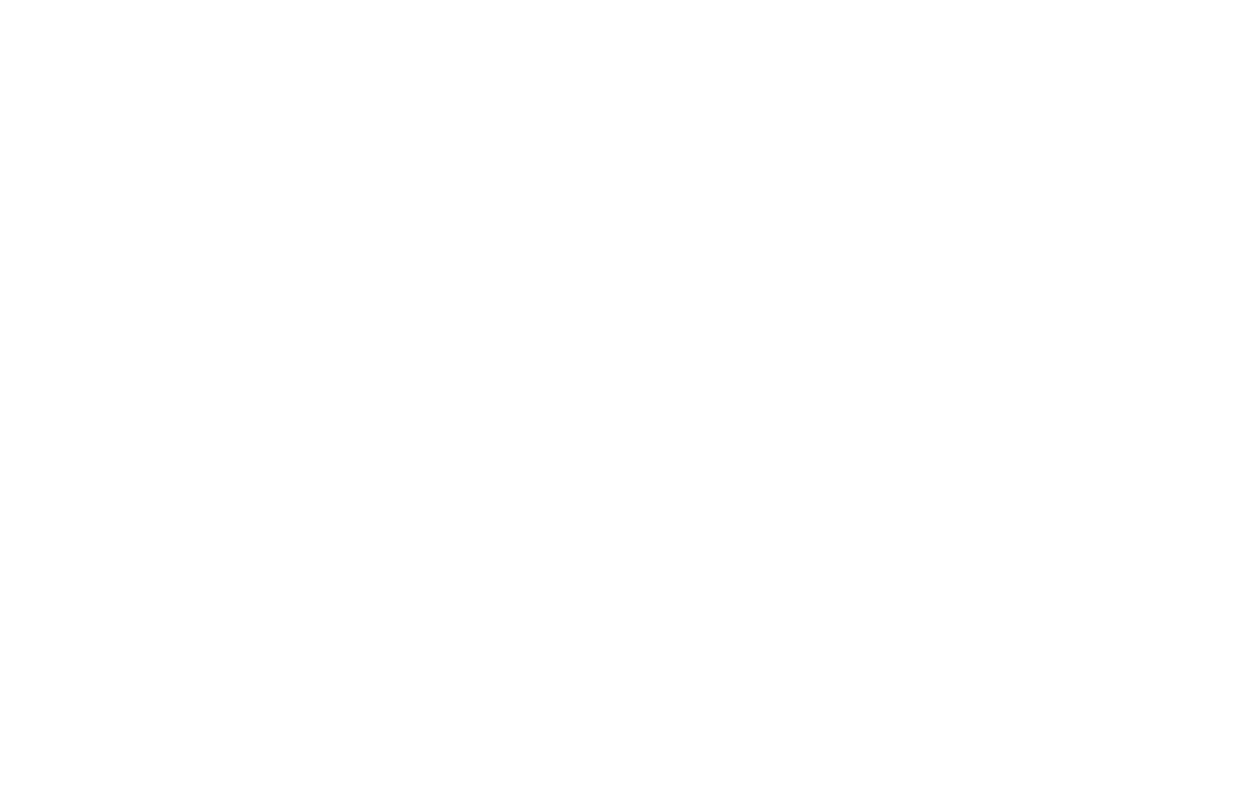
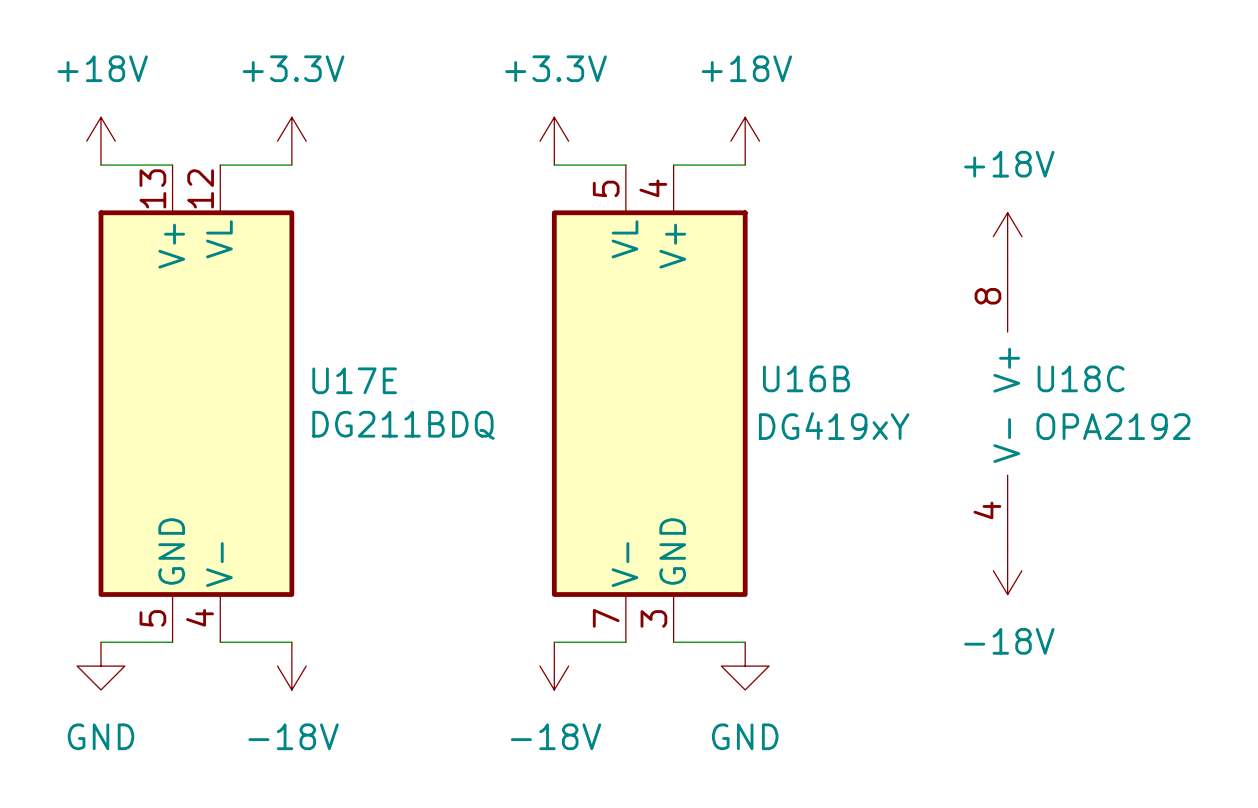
power symbol: none -> +18V (101, 141)
power symbol: none -> +3.3V (291, 141)
power symbol: none -> +3.3V (554, 141)
power symbol: none -> +18V (745, 141)
wire: none -> (101, 165) (172, 165)
wire: none -> (220, 165) (291, 165)
wire: none -> (554, 165) (625, 165)
wire: none -> (673, 165) (745, 165)
power symbol: none -> +18V (1007, 236)
U17E: none -> DG211BDQ (196, 403)
U16B: none -> DG419xY (649, 403)
U18C: none -> OPA2192 (1007, 403)
power symbol: none -> -18V (1007, 570)
wire: none -> (101, 642) (172, 642)
wire: none -> (220, 642) (291, 642)
wire: none -> (554, 642) (625, 642)
wire: none -> (673, 642) (745, 642)
power symbol: none -> GND (101, 666)
power symbol: none -> -18V (291, 666)
power symbol: none -> -18V (554, 666)
power symbol: none -> GND (745, 666)

